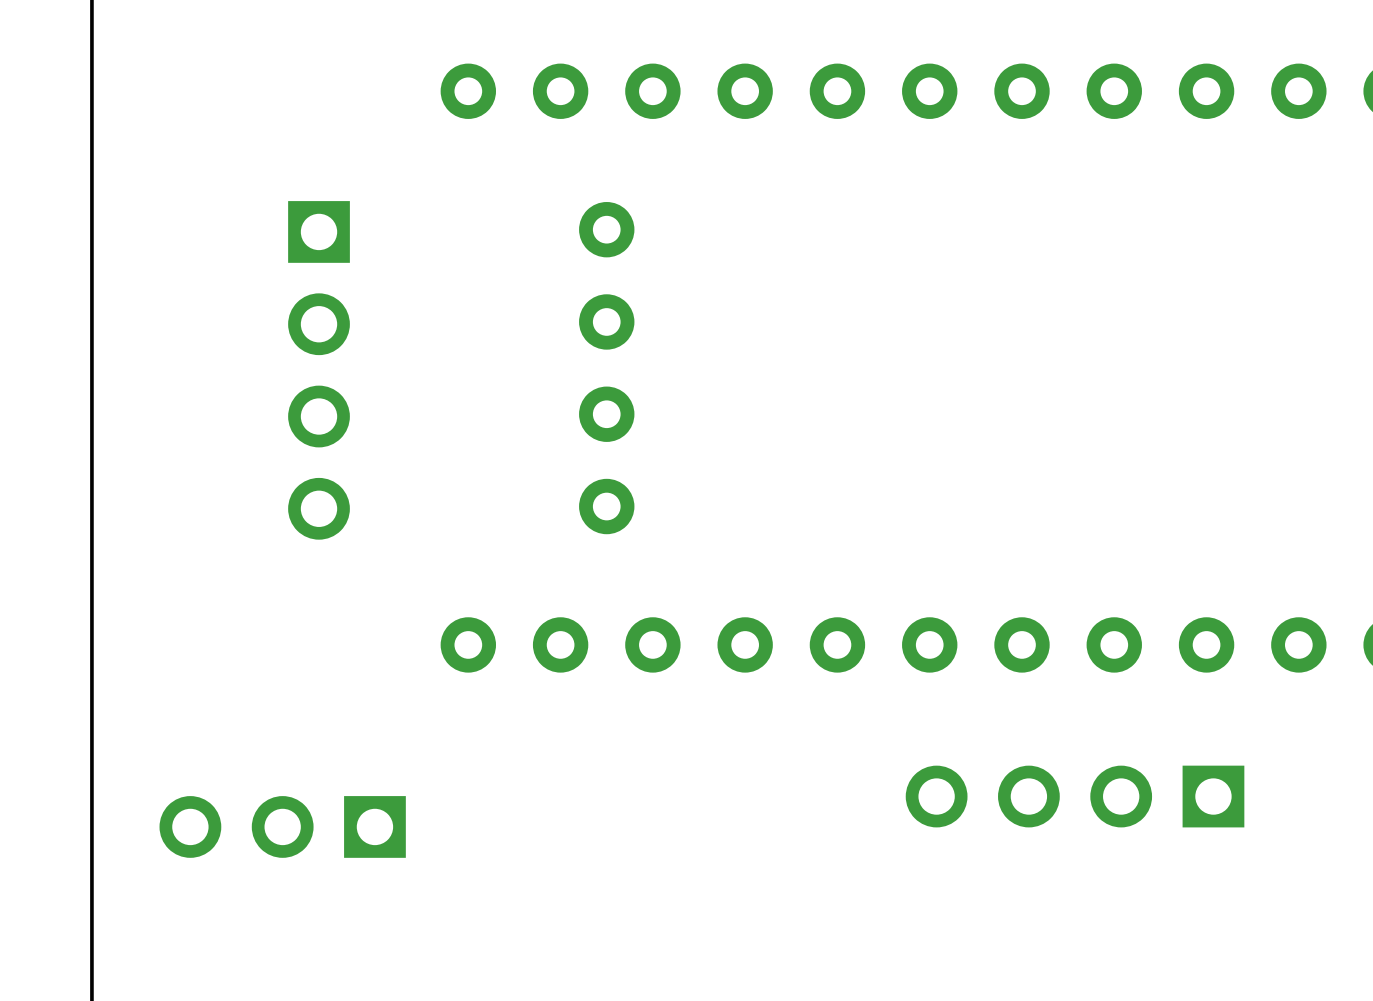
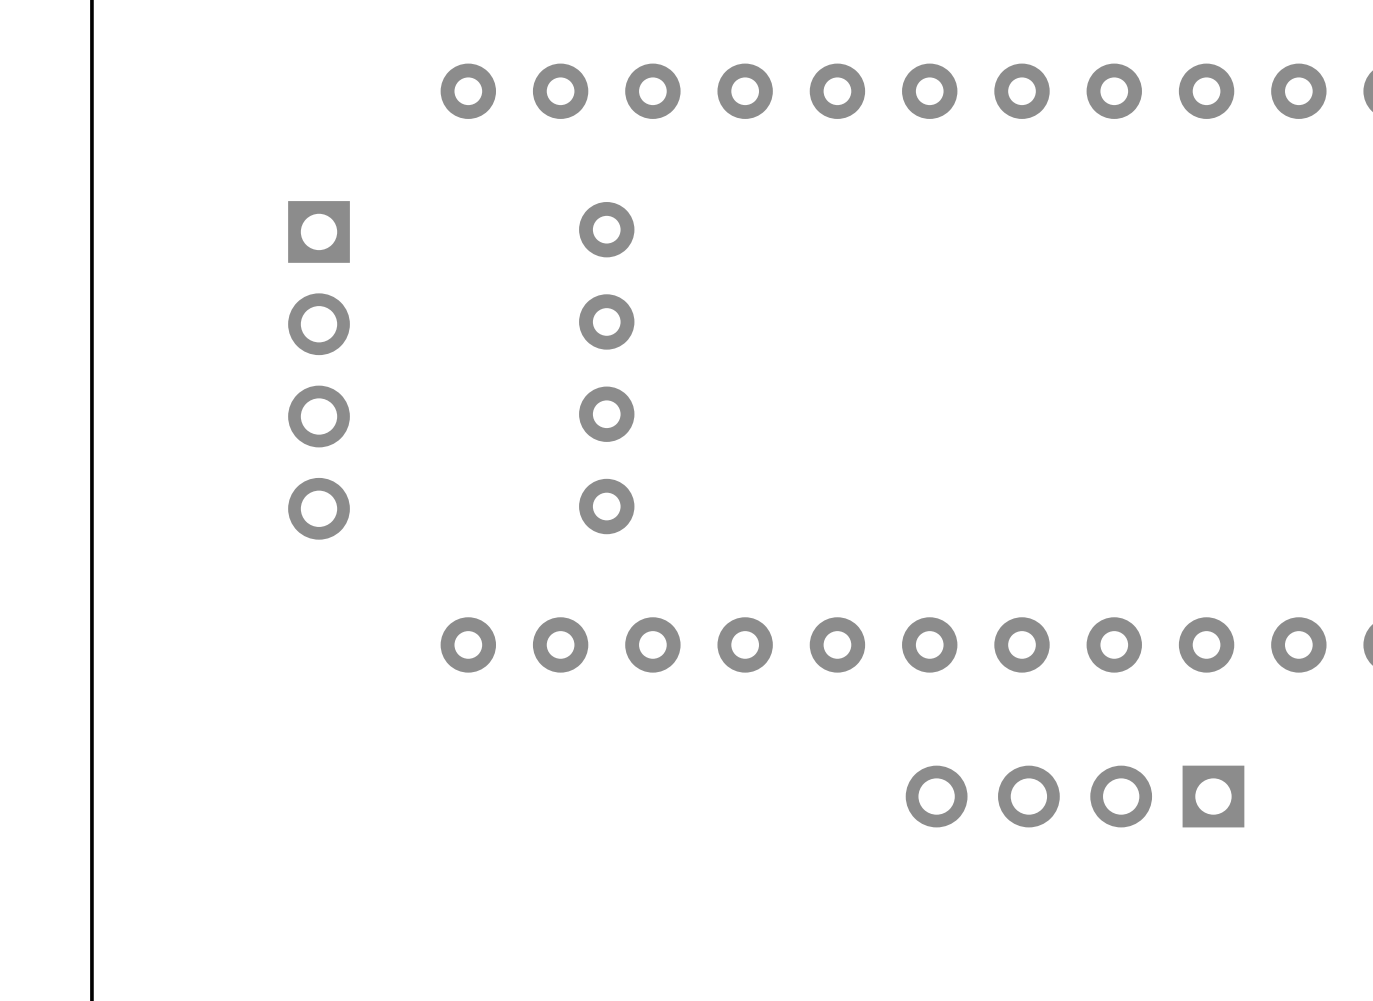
part: (282, 826) -> none

